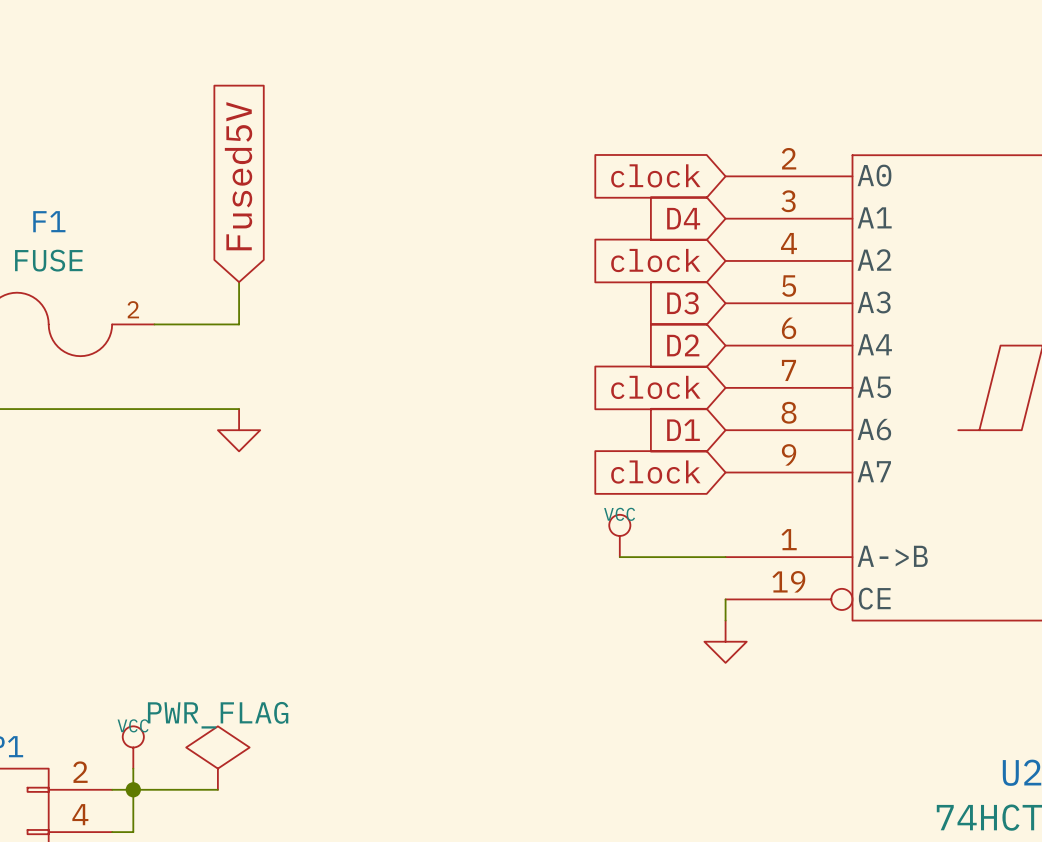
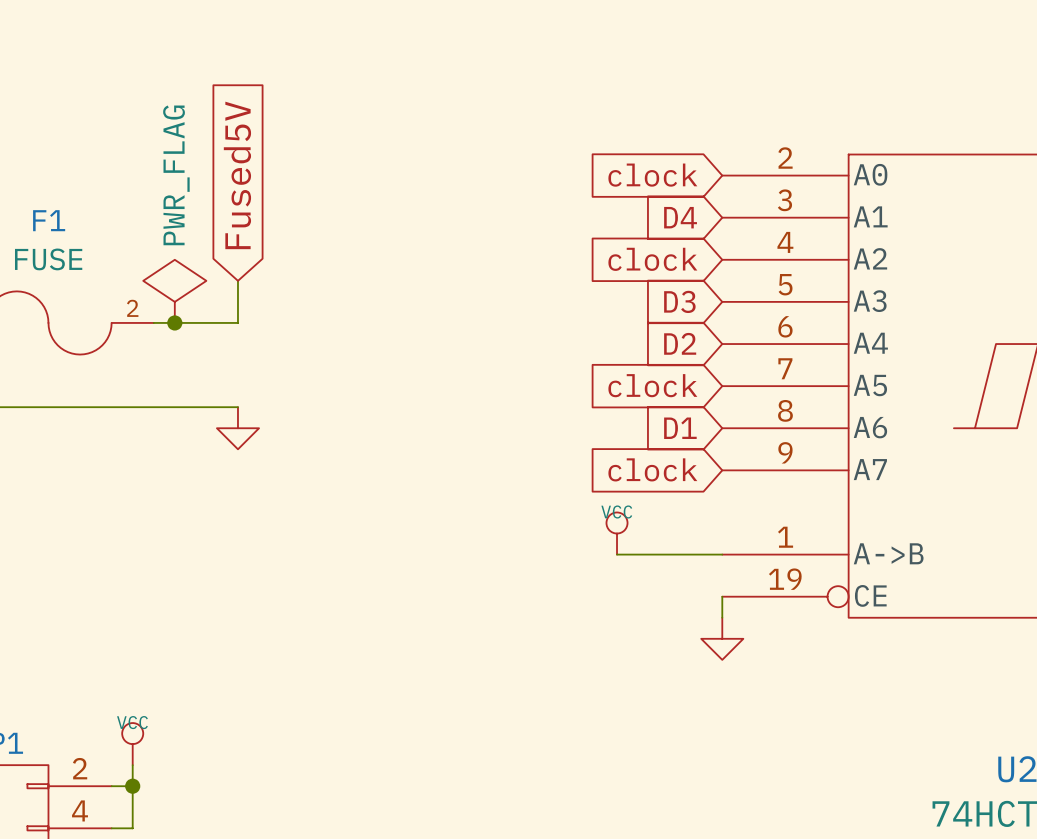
power symbol: none -> PWR_FLAG (174, 291)
junction: none -> (174, 322)
power symbol: PWR_FLAG (217, 758) -> none
wire: (133, 789) (217, 789) -> none

